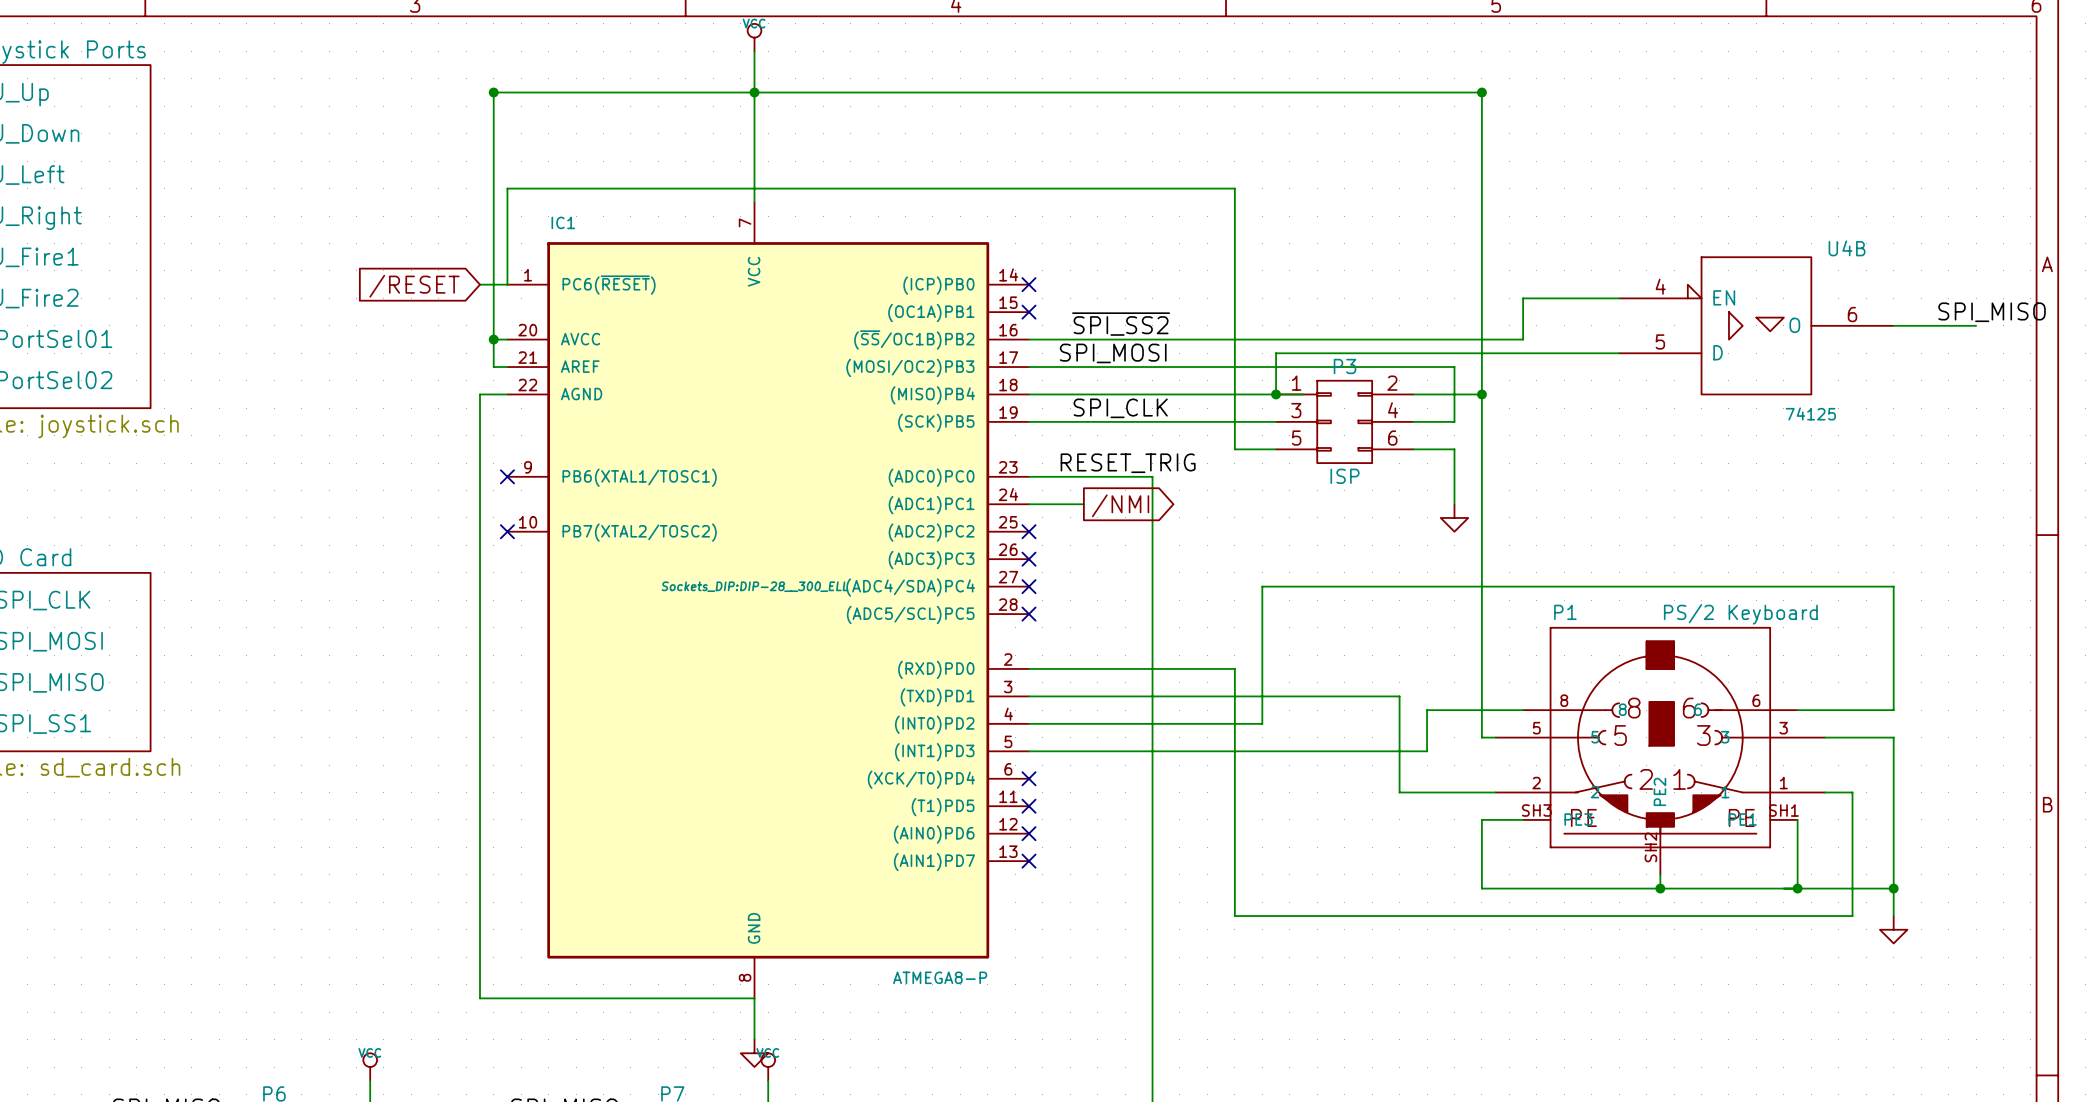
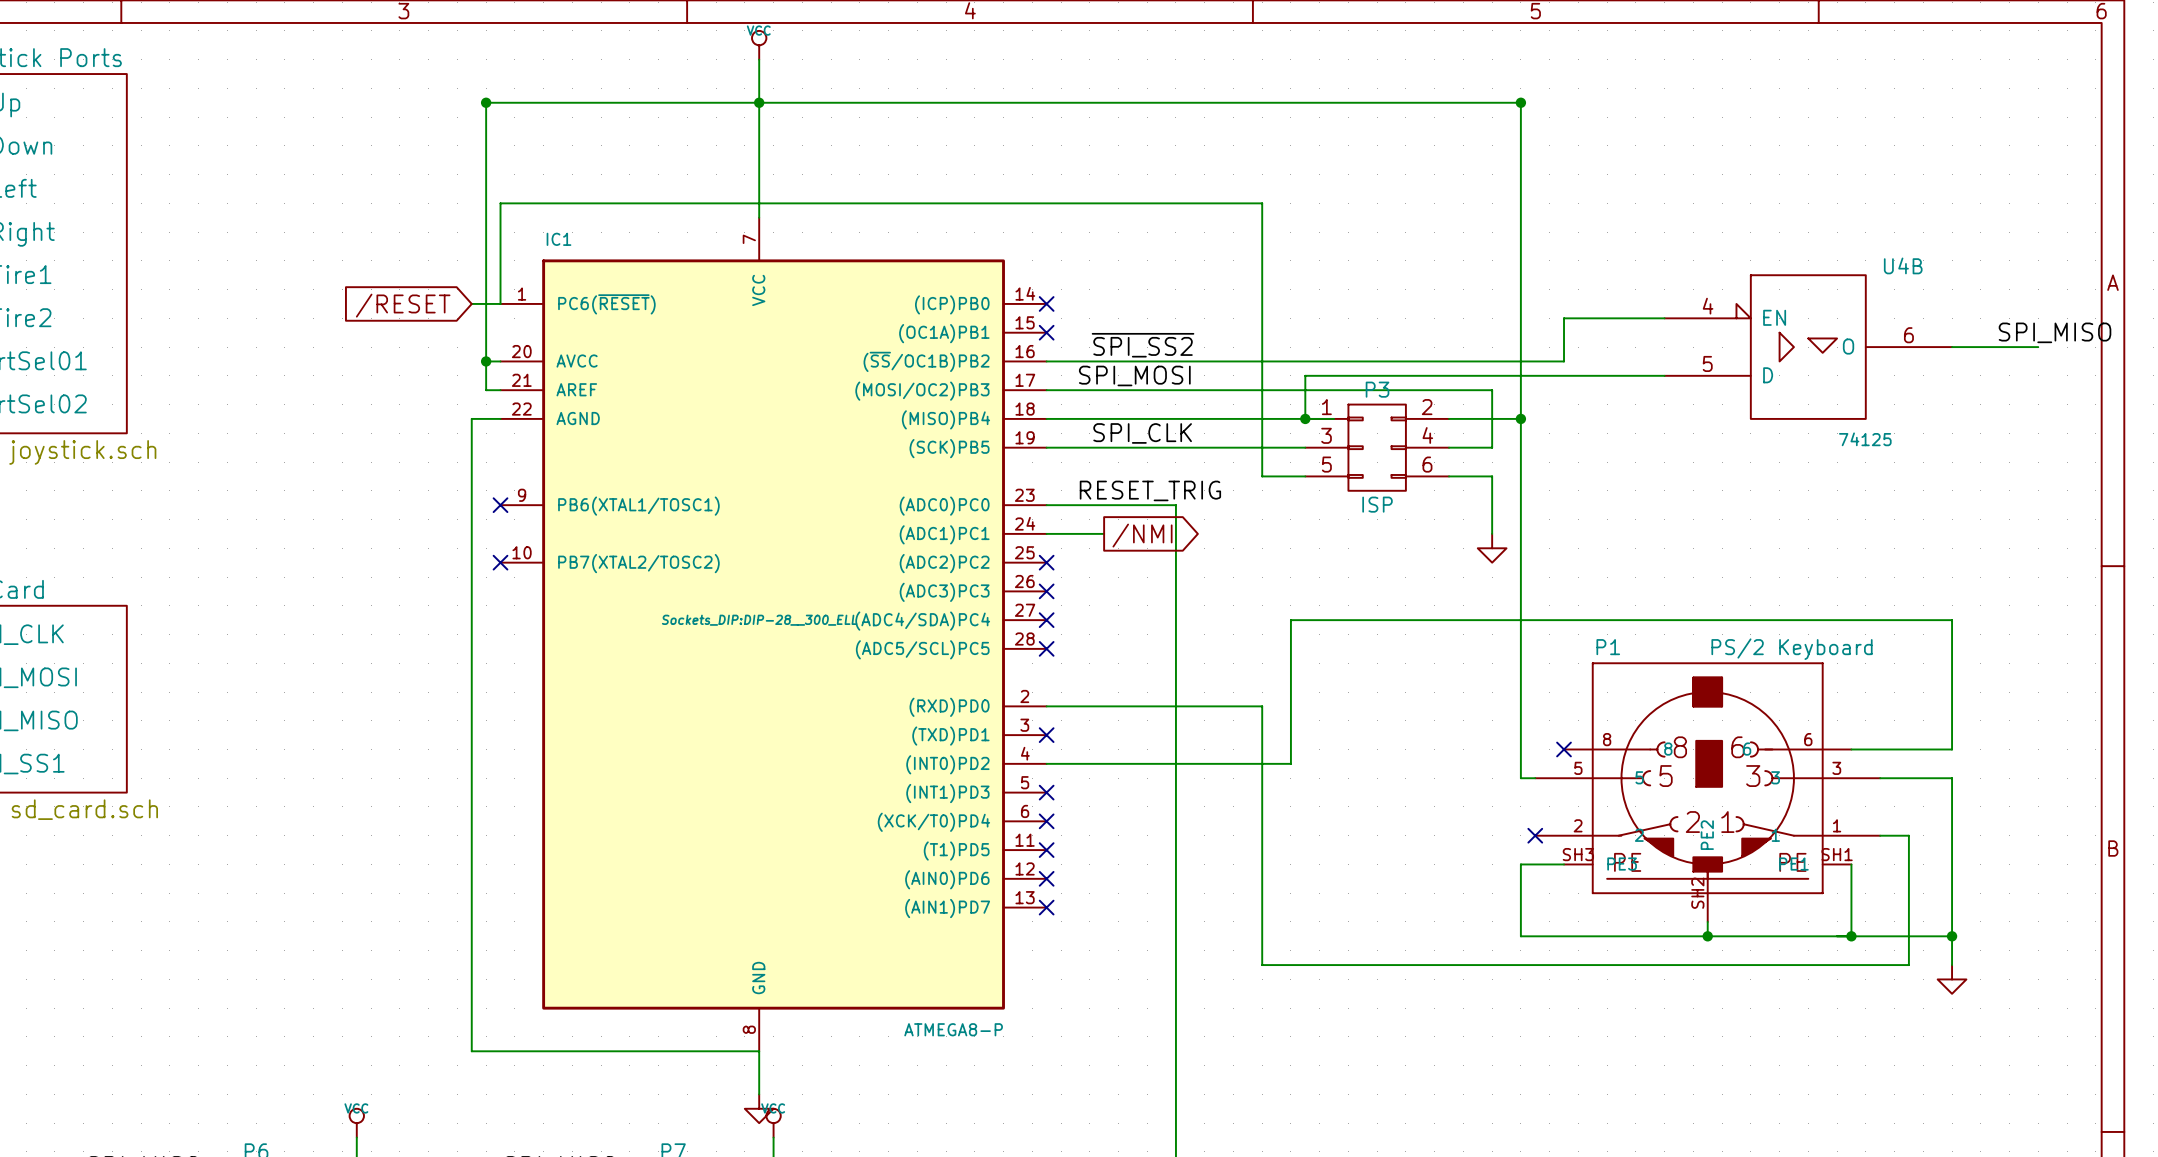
wire: (1029, 696) (1399, 696) (1399, 792) (1495, 792) -> none
no-connect mark: none -> (1046, 735)
wire: (1523, 710) (1427, 710) (1427, 751) (1029, 751) -> none
no-connect mark: none -> (1564, 749)
no-connect mark: none -> (1046, 792)
no-connect mark: none -> (1535, 835)

